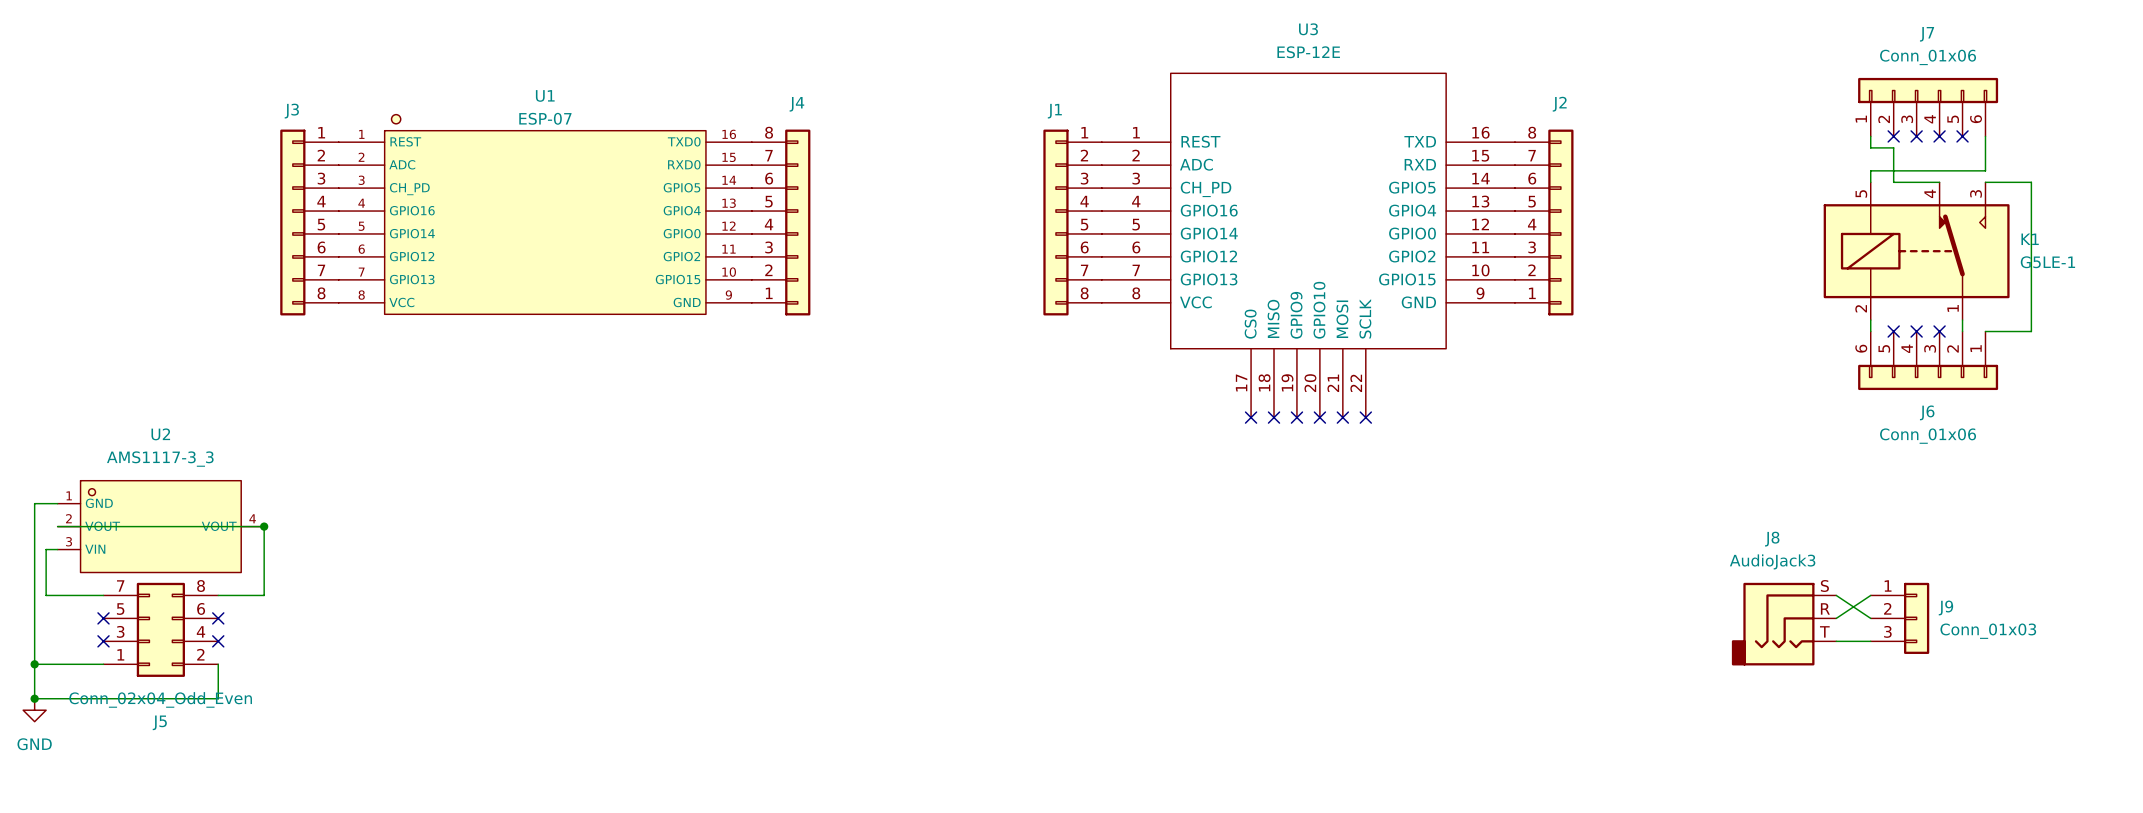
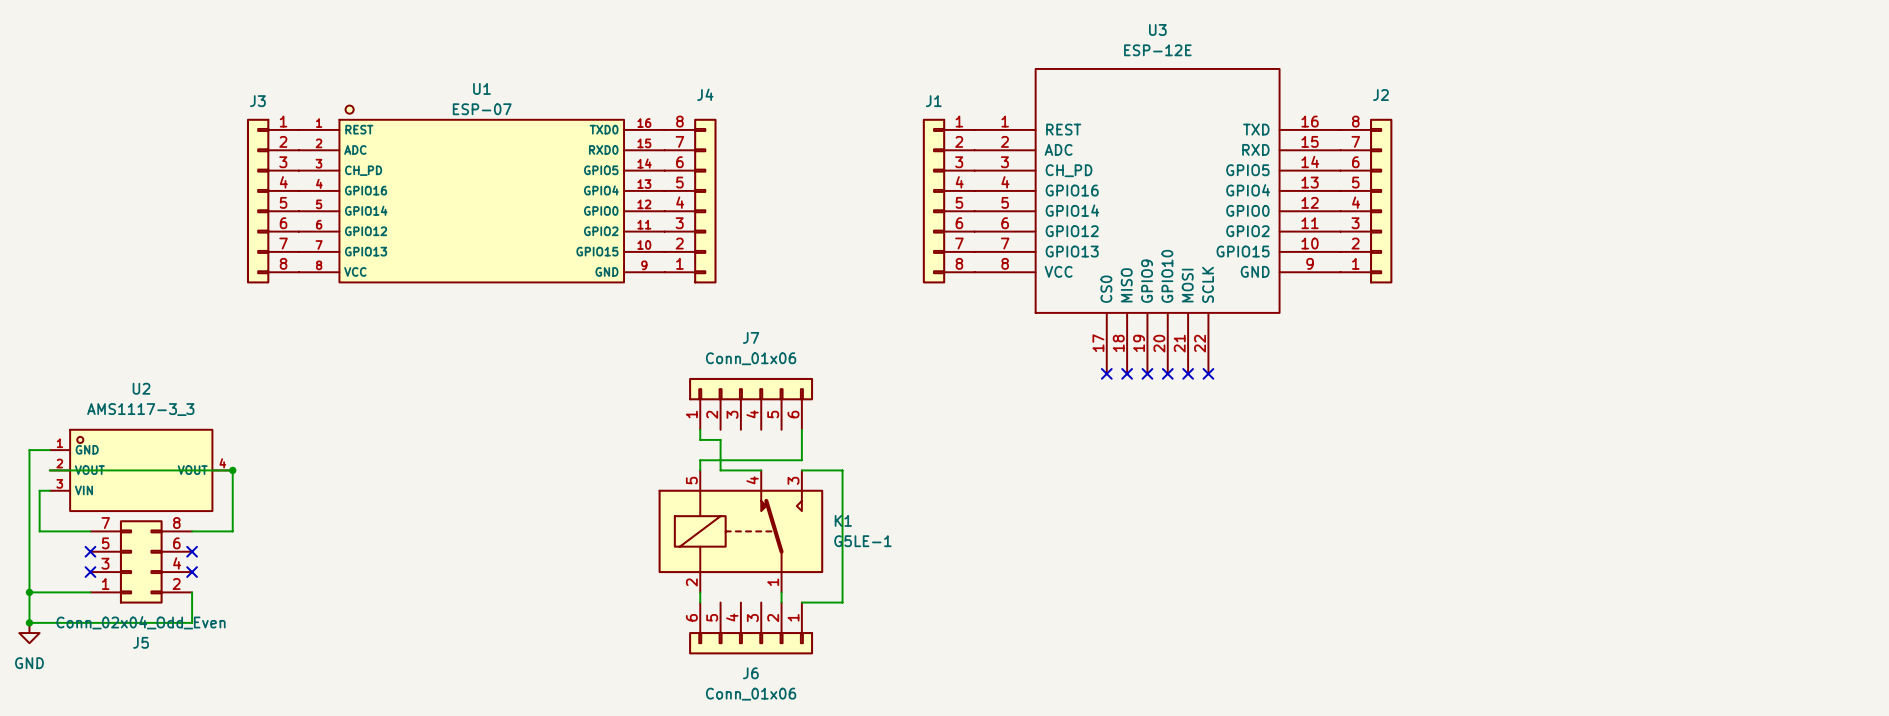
J7 position: (1928, 107) -> (751, 403)
wire: (1870, 136) (1870, 147) (1893, 147) (1893, 182) (1939, 182) -> none
no-connect mark: (1893, 136) -> none
no-connect mark: (1916, 136) -> none
no-connect mark: (1939, 136) -> none
no-connect mark: (1962, 136) -> none
wire: (1985, 136) (1985, 170) (1870, 170) (1870, 182) -> none
wire: (1985, 182) (2031, 182) (2031, 331) (1985, 331) -> none
K1 position: (1916, 251) -> (740, 531)
wire: (1870, 320) (1870, 331) -> none
wire: (1962, 320) (1962, 331) -> none
no-connect mark: (1893, 331) -> none
no-connect mark: (1916, 331) -> none
no-connect mark: (1939, 331) -> none
J6 position: (1928, 360) -> (751, 628)
wire: none -> (700, 429) (700, 439) (720, 439) (720, 470) (761, 470)
wire: none -> (801, 429) (801, 460) (700, 460) (700, 470)
wire: none -> (801, 470) (842, 470) (842, 602) (801, 602)
wire: (1836, 595) (1870, 618) -> none
wire: (1870, 595) (1836, 618) -> none
J9: Conn_01x03 (1899, 618) -> none
J8: AudioJack3 (1784, 624) -> none
wire: (1836, 641) (1870, 641) -> none
wire: none -> (700, 592) (700, 602)
wire: none -> (781, 592) (781, 602)

